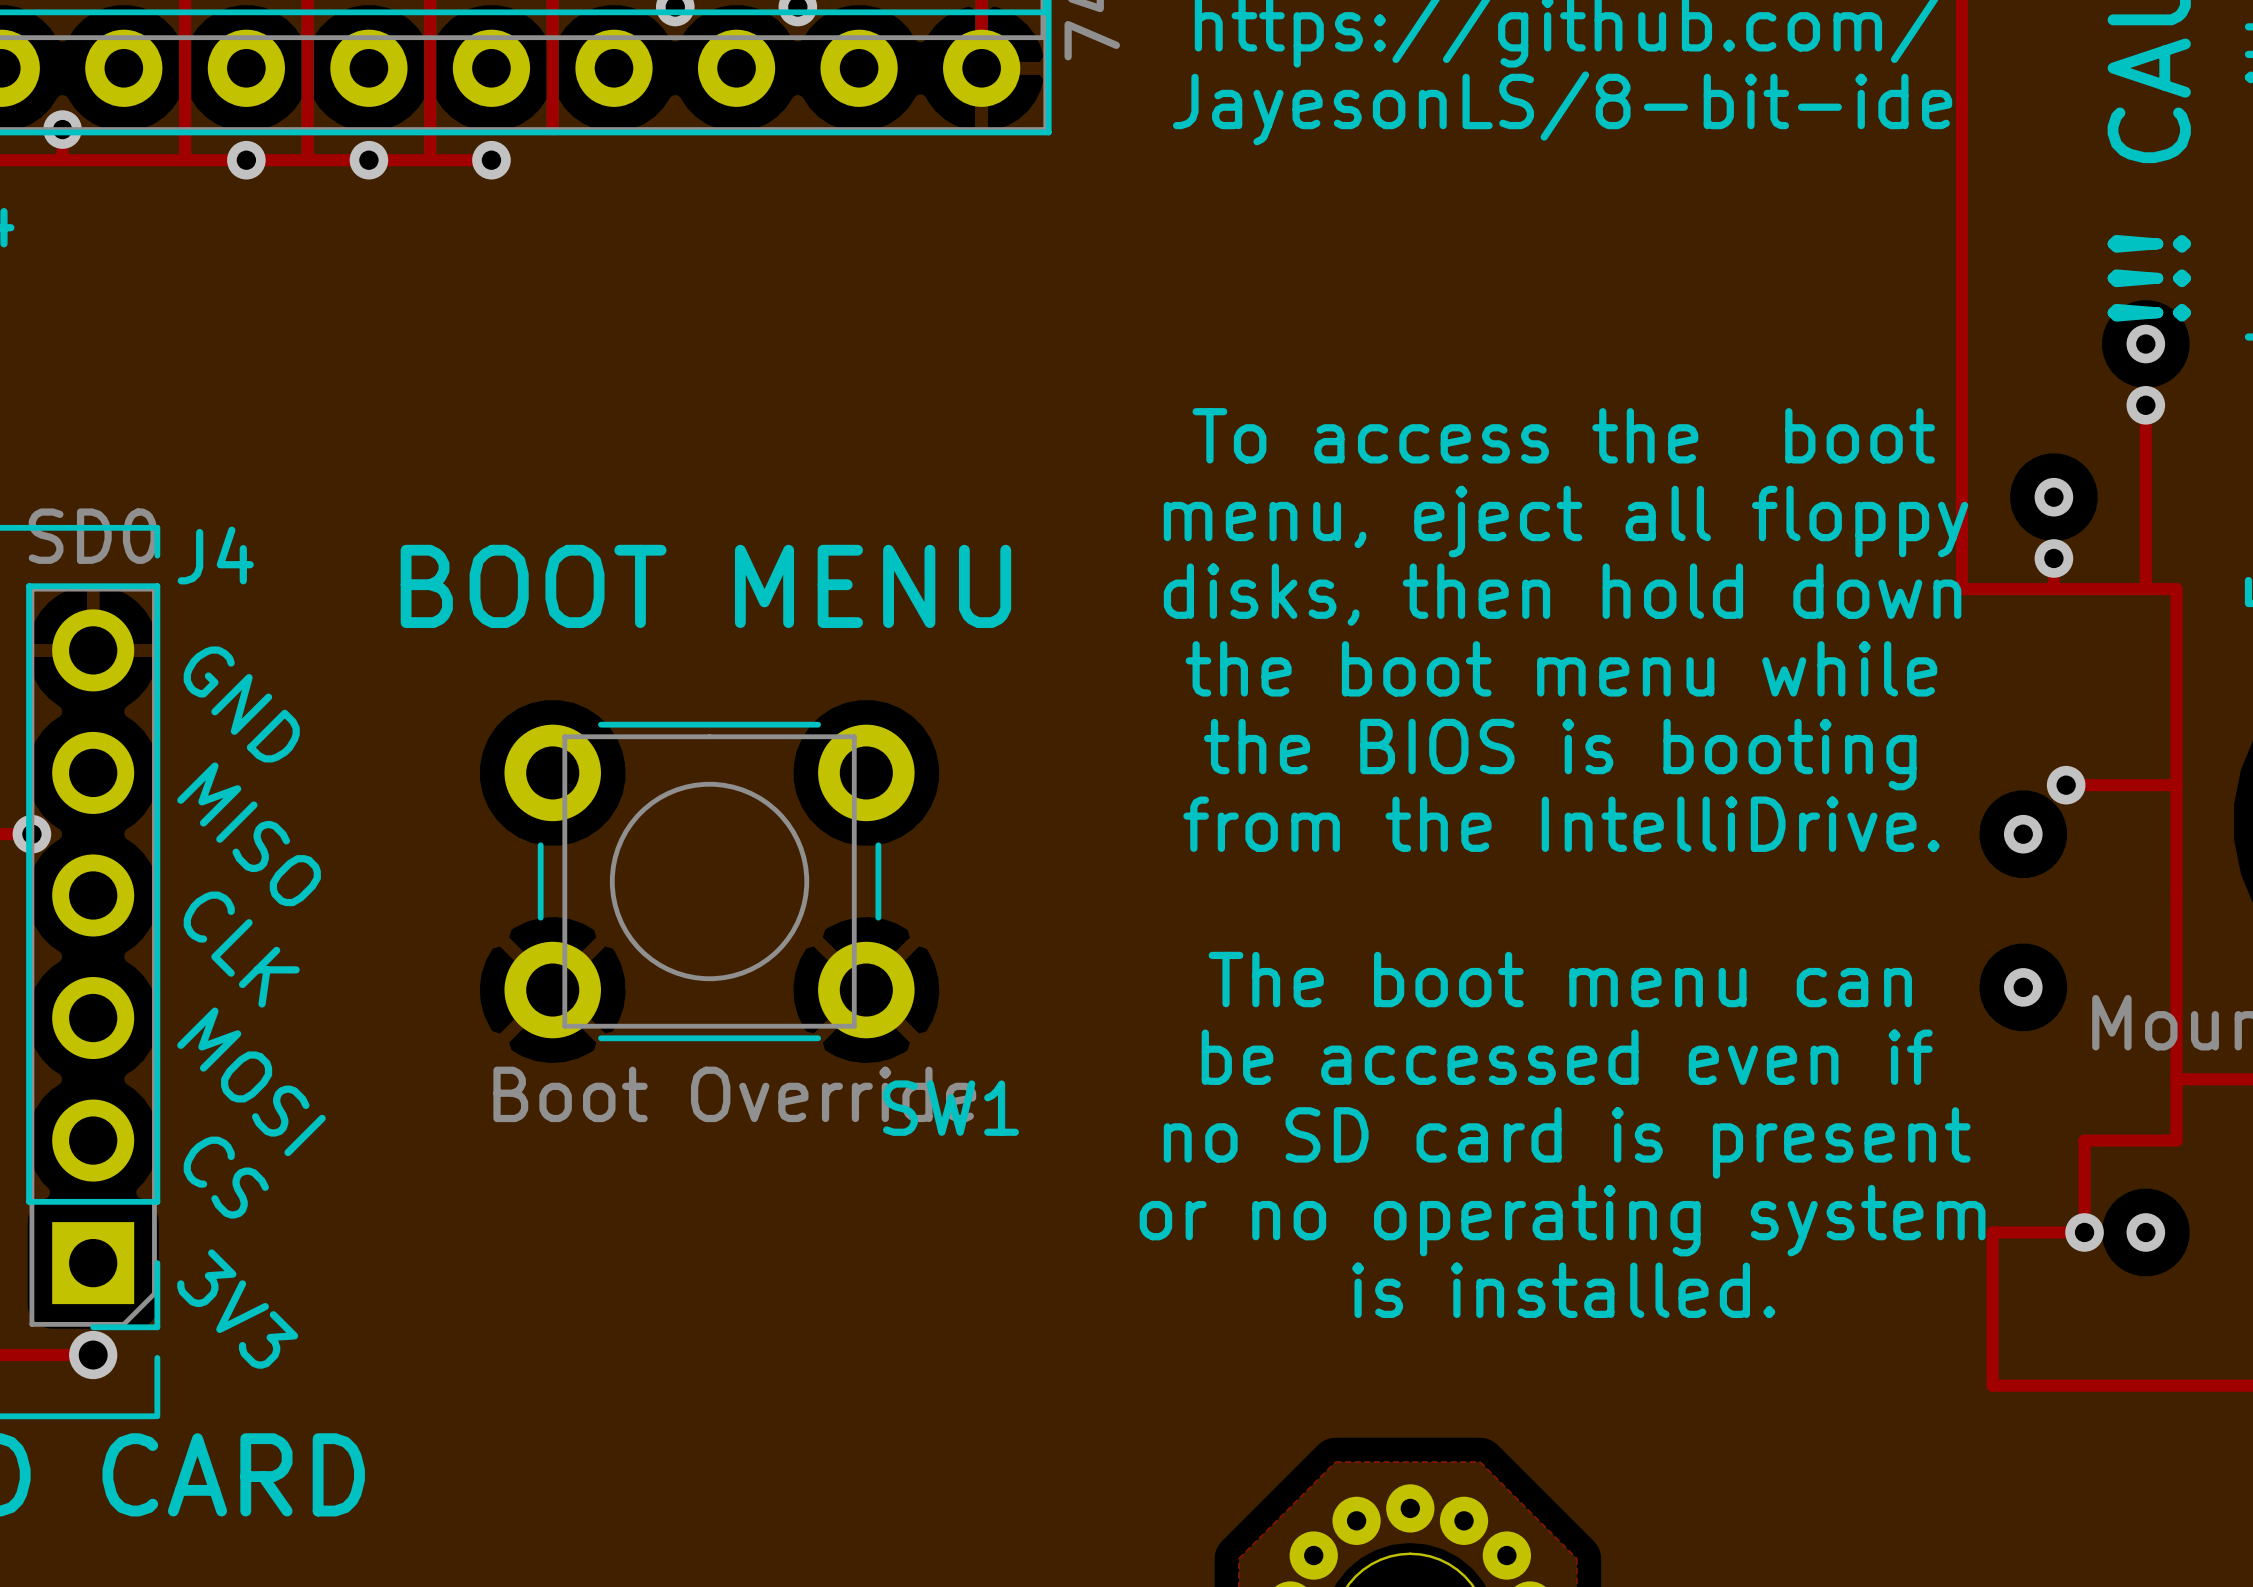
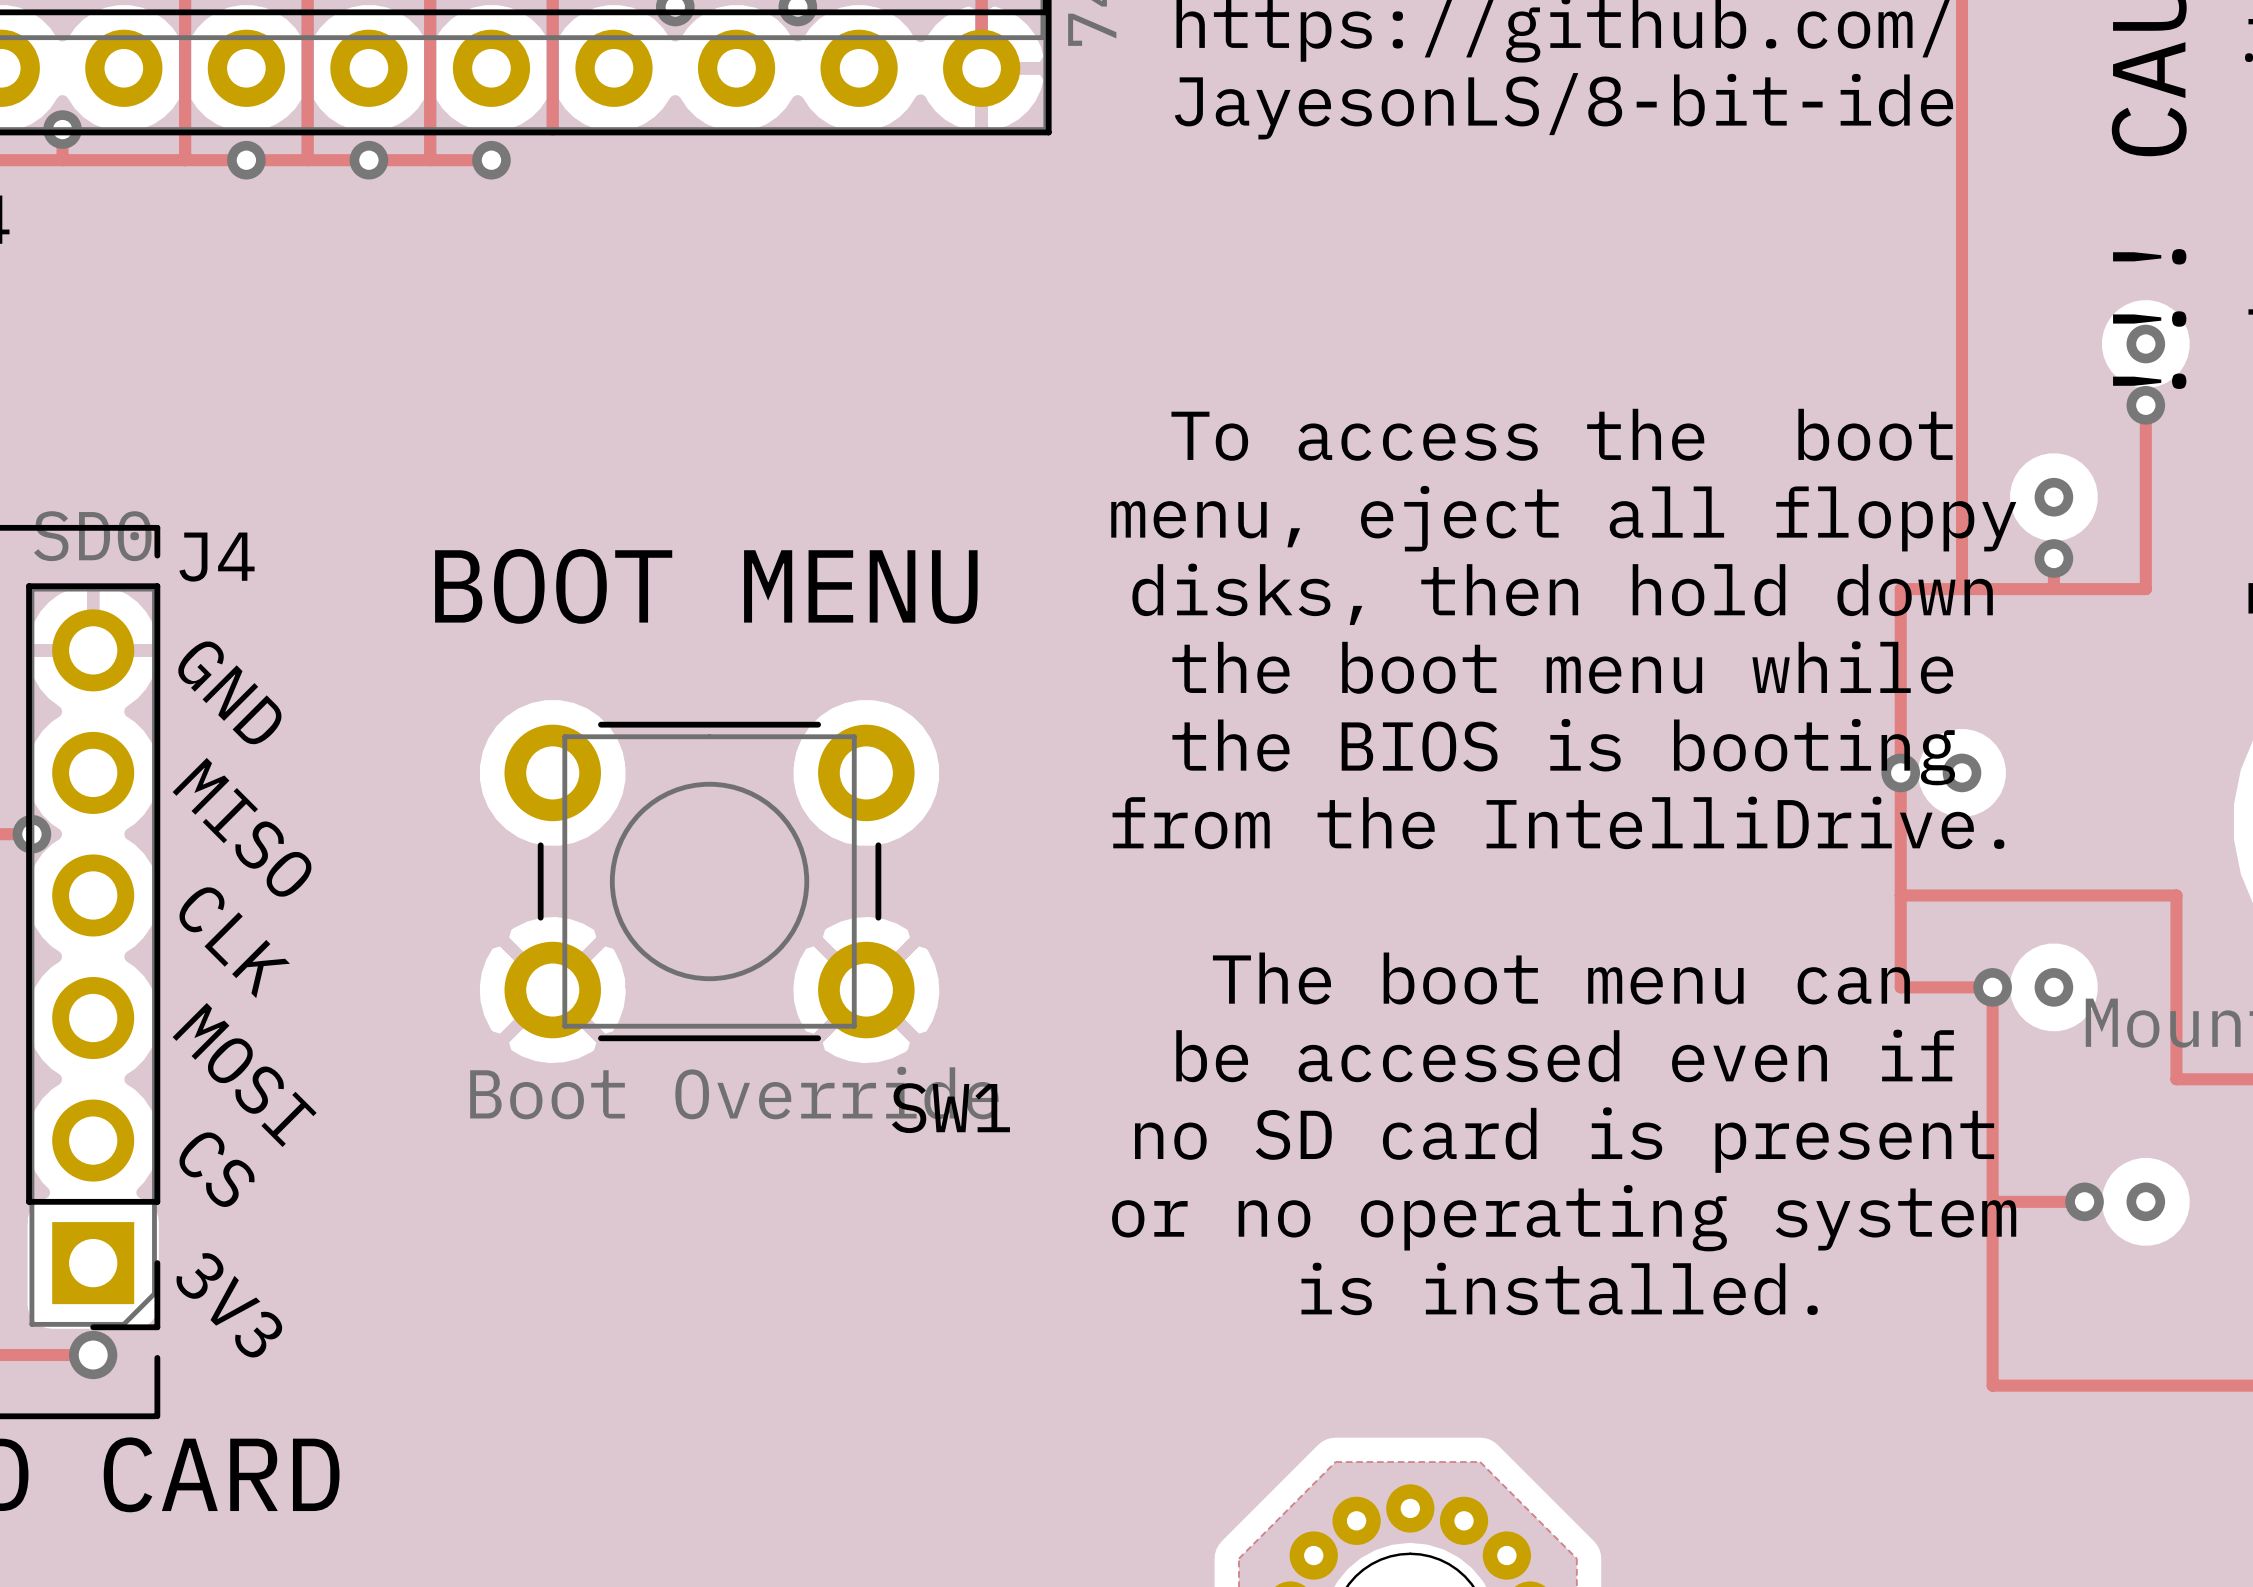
top track: (2145, 589) (2176, 589) (2176, 895) -> (1900, 895) (2176, 895)
via: none -> (1900, 772)
via: none -> (1962, 772)
top track: (2066, 785) (2176, 785) -> none
via: (2066, 785) -> none
via: (2023, 834) -> none
via: none -> (1992, 987)
via: (2023, 987) -> none
via: none -> (2053, 987)
top track: (2176, 1079) (2176, 1140) (2084, 1140) (2084, 1232) (1992, 1232) -> (1962, 589) (1900, 589) (1900, 987) (1992, 987) (1992, 1232)
top track: none -> (1992, 1201) (2084, 1201)
via position: (2084, 1232) -> (2084, 1201)
via position: (2145, 1232) -> (2145, 1201)

